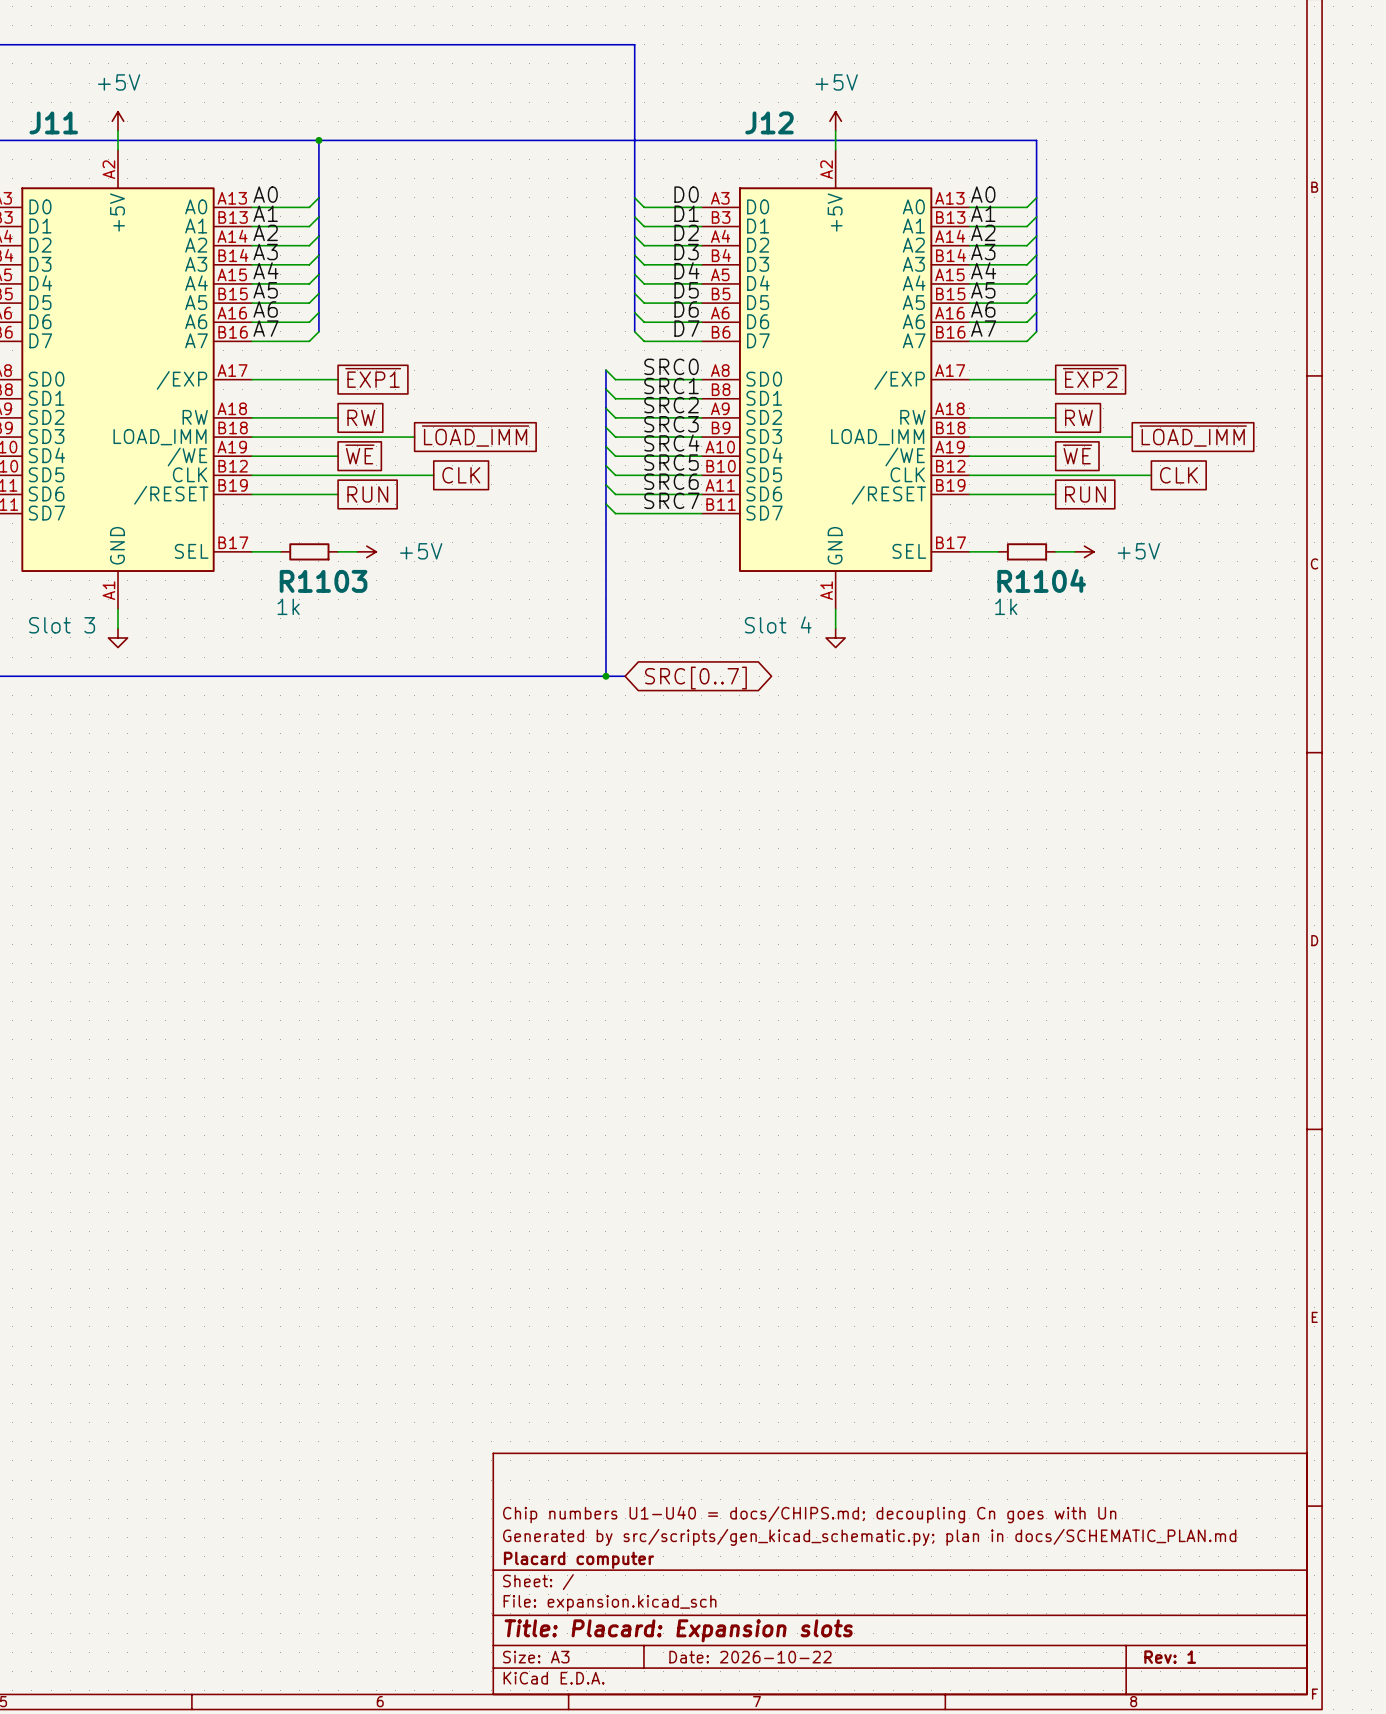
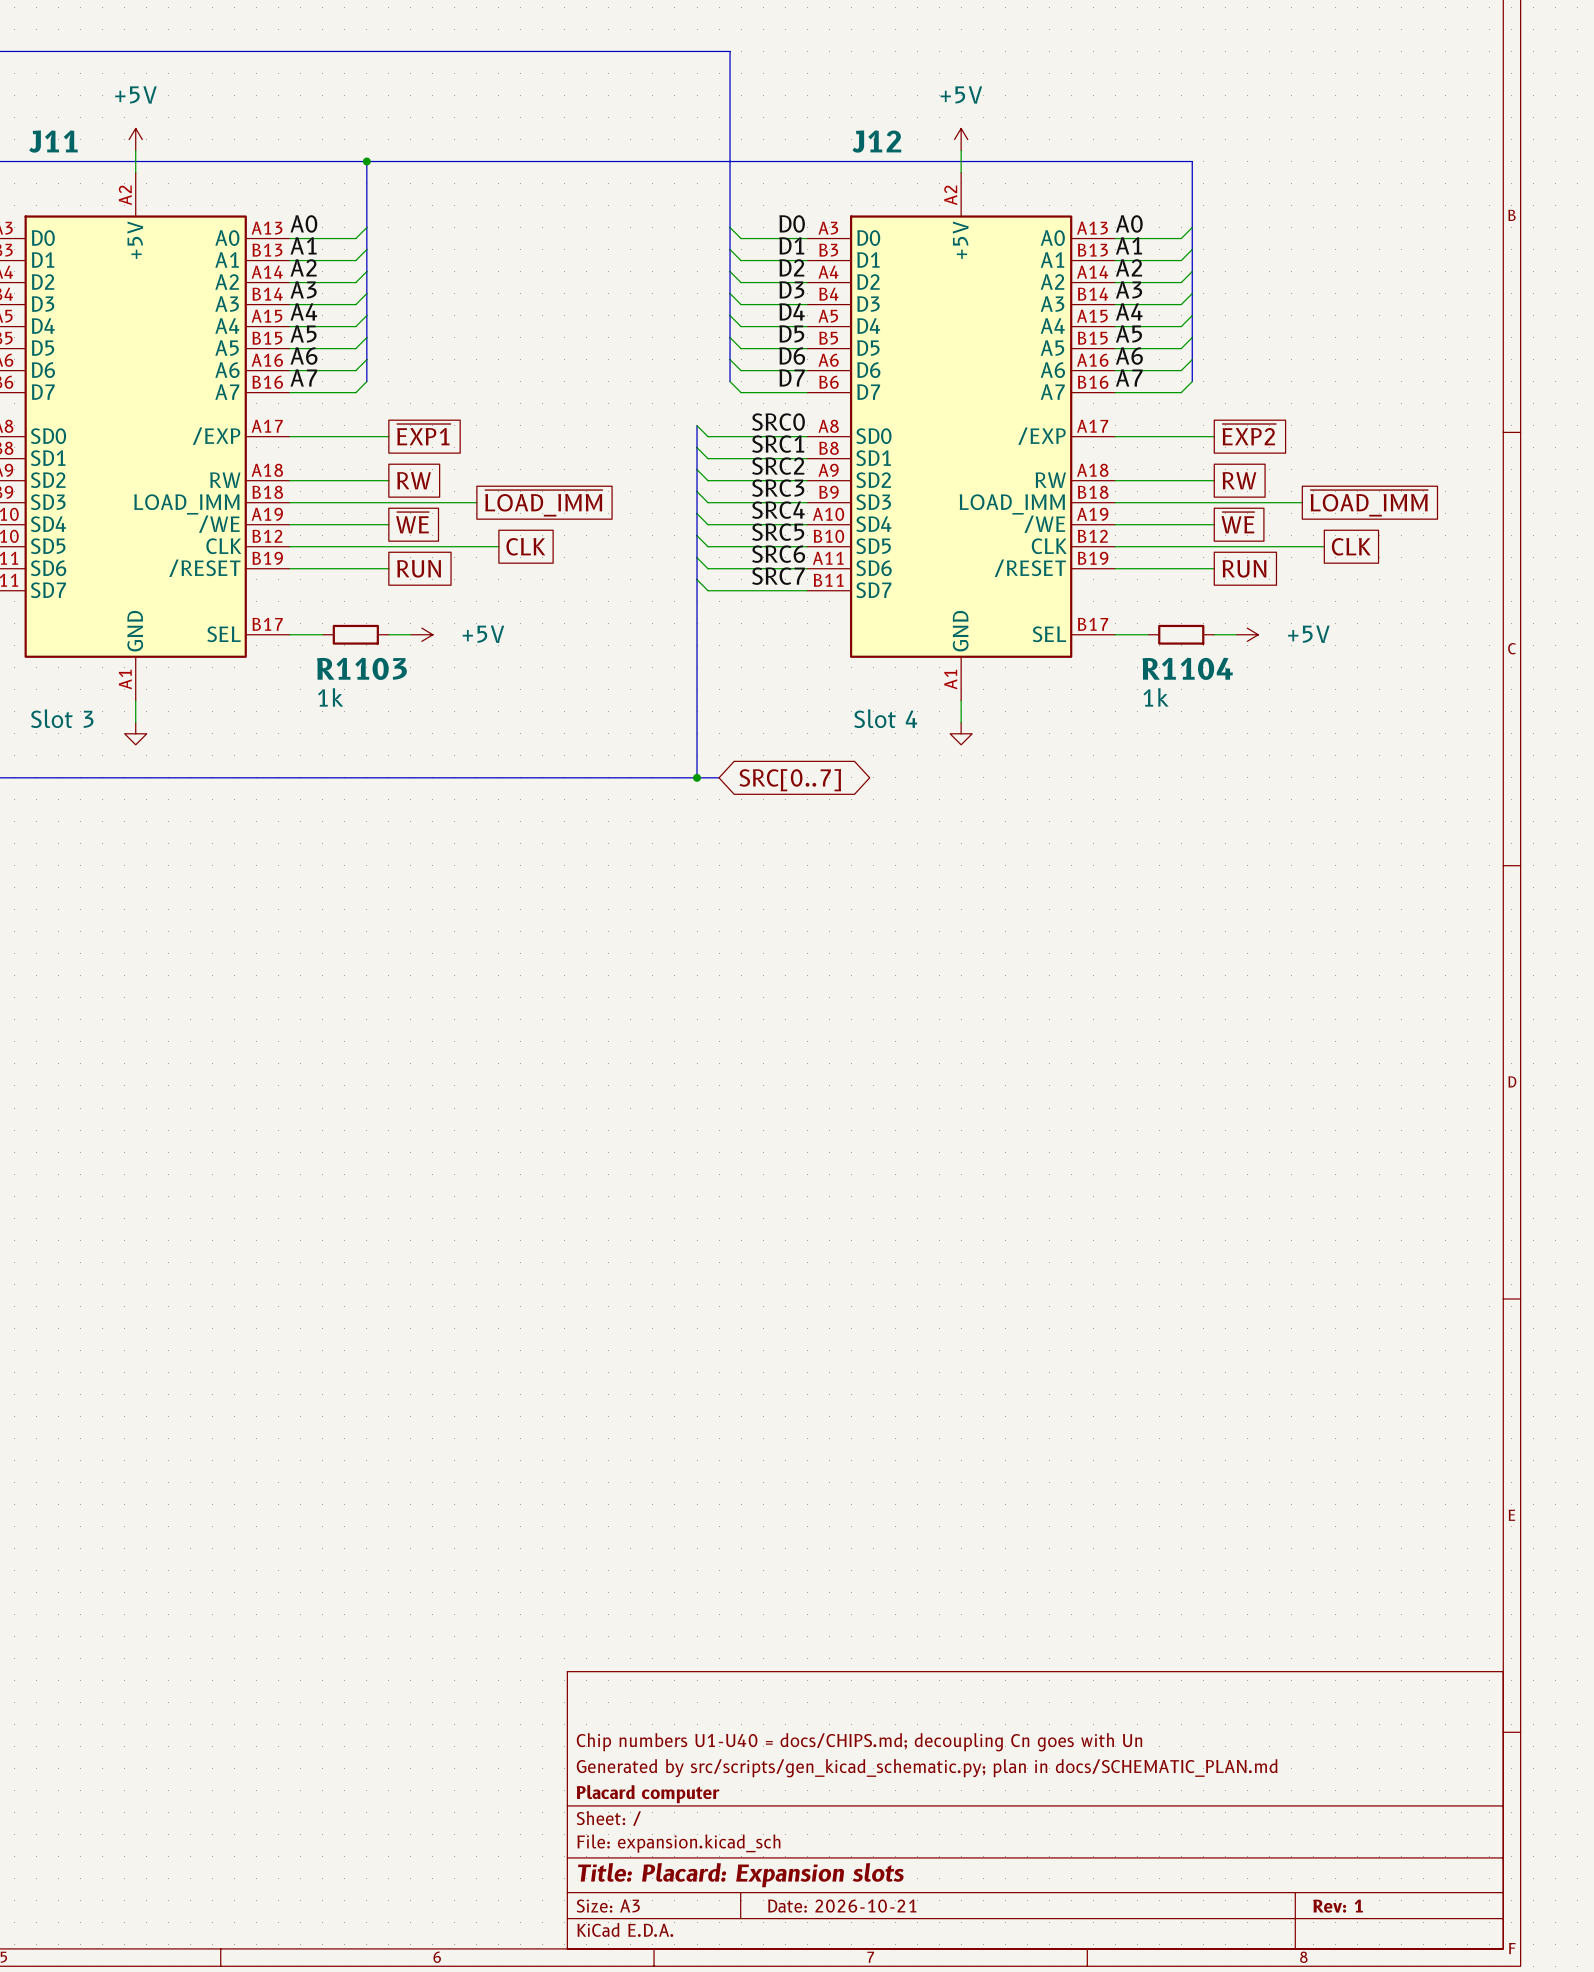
title block: Date: 2026-10-22 (750, 1657) -> Date: 2026-10-21 (842, 1906)

